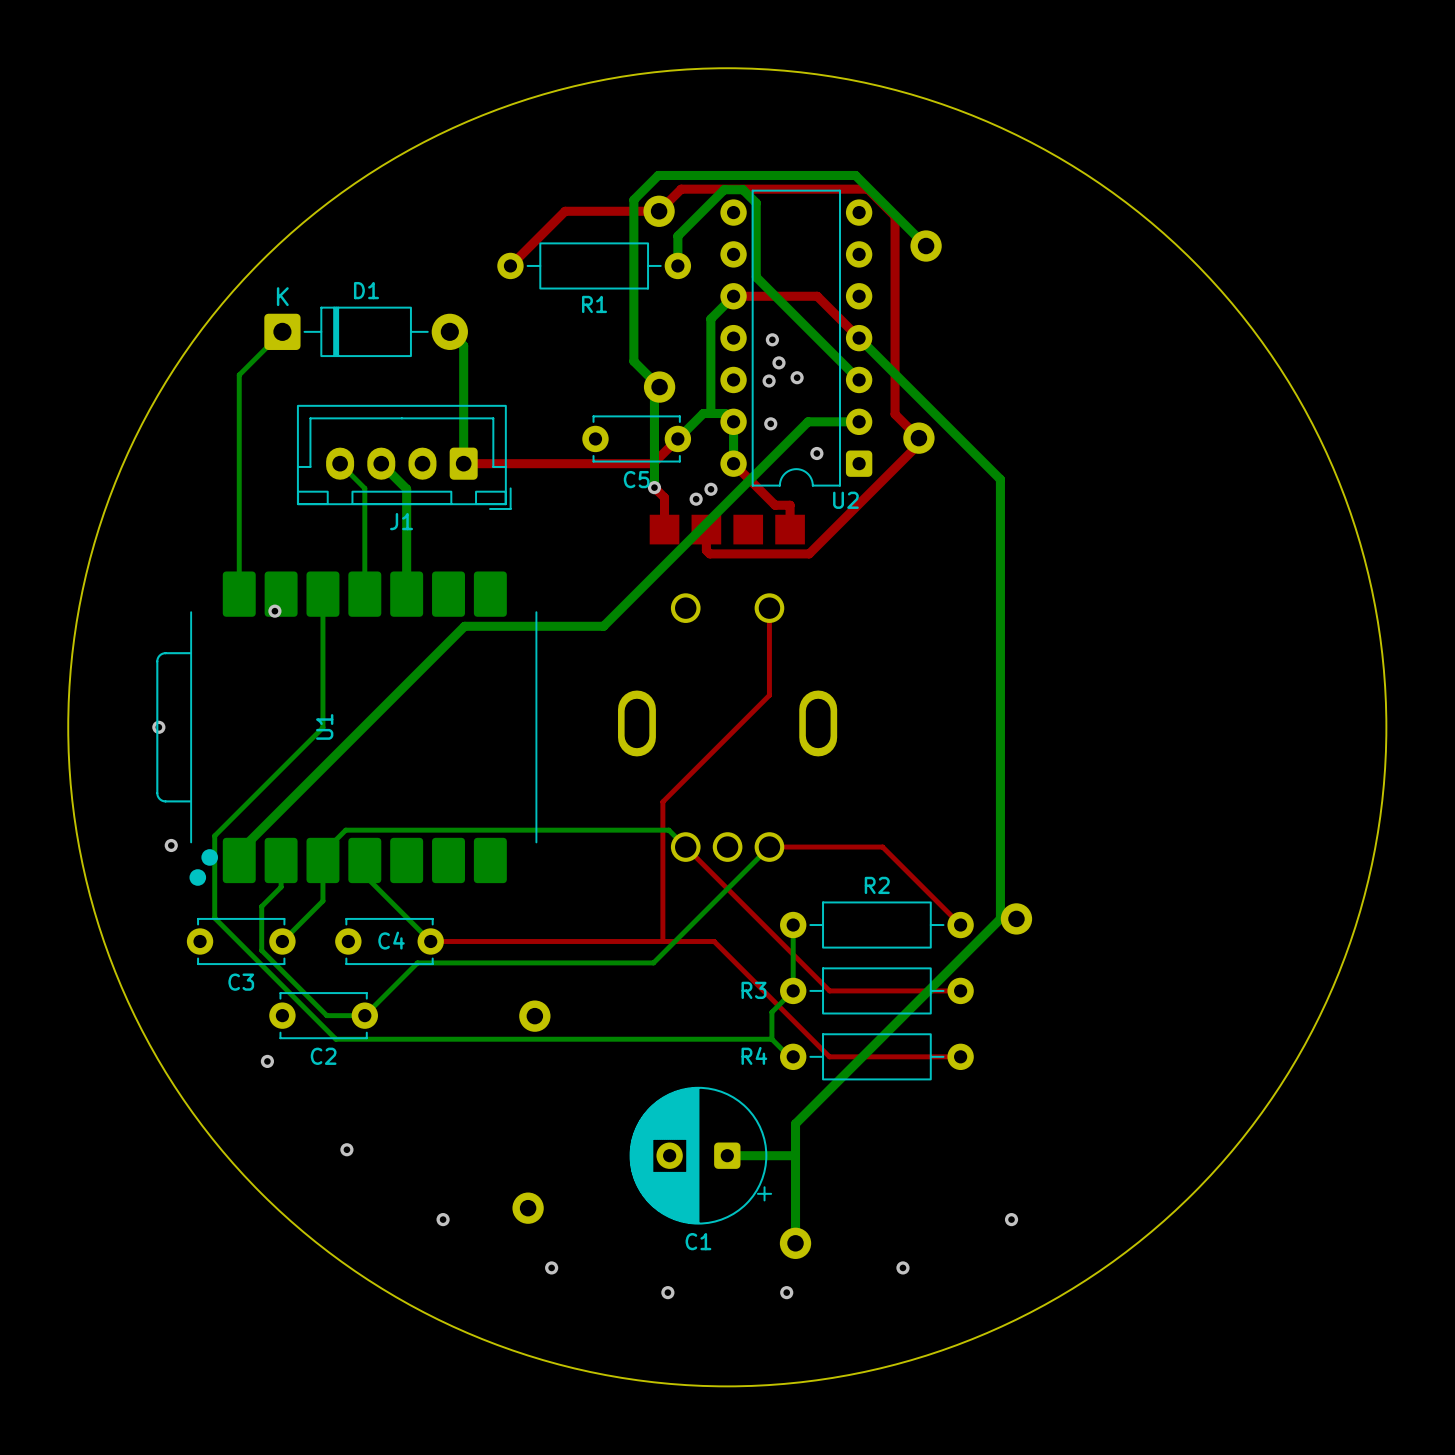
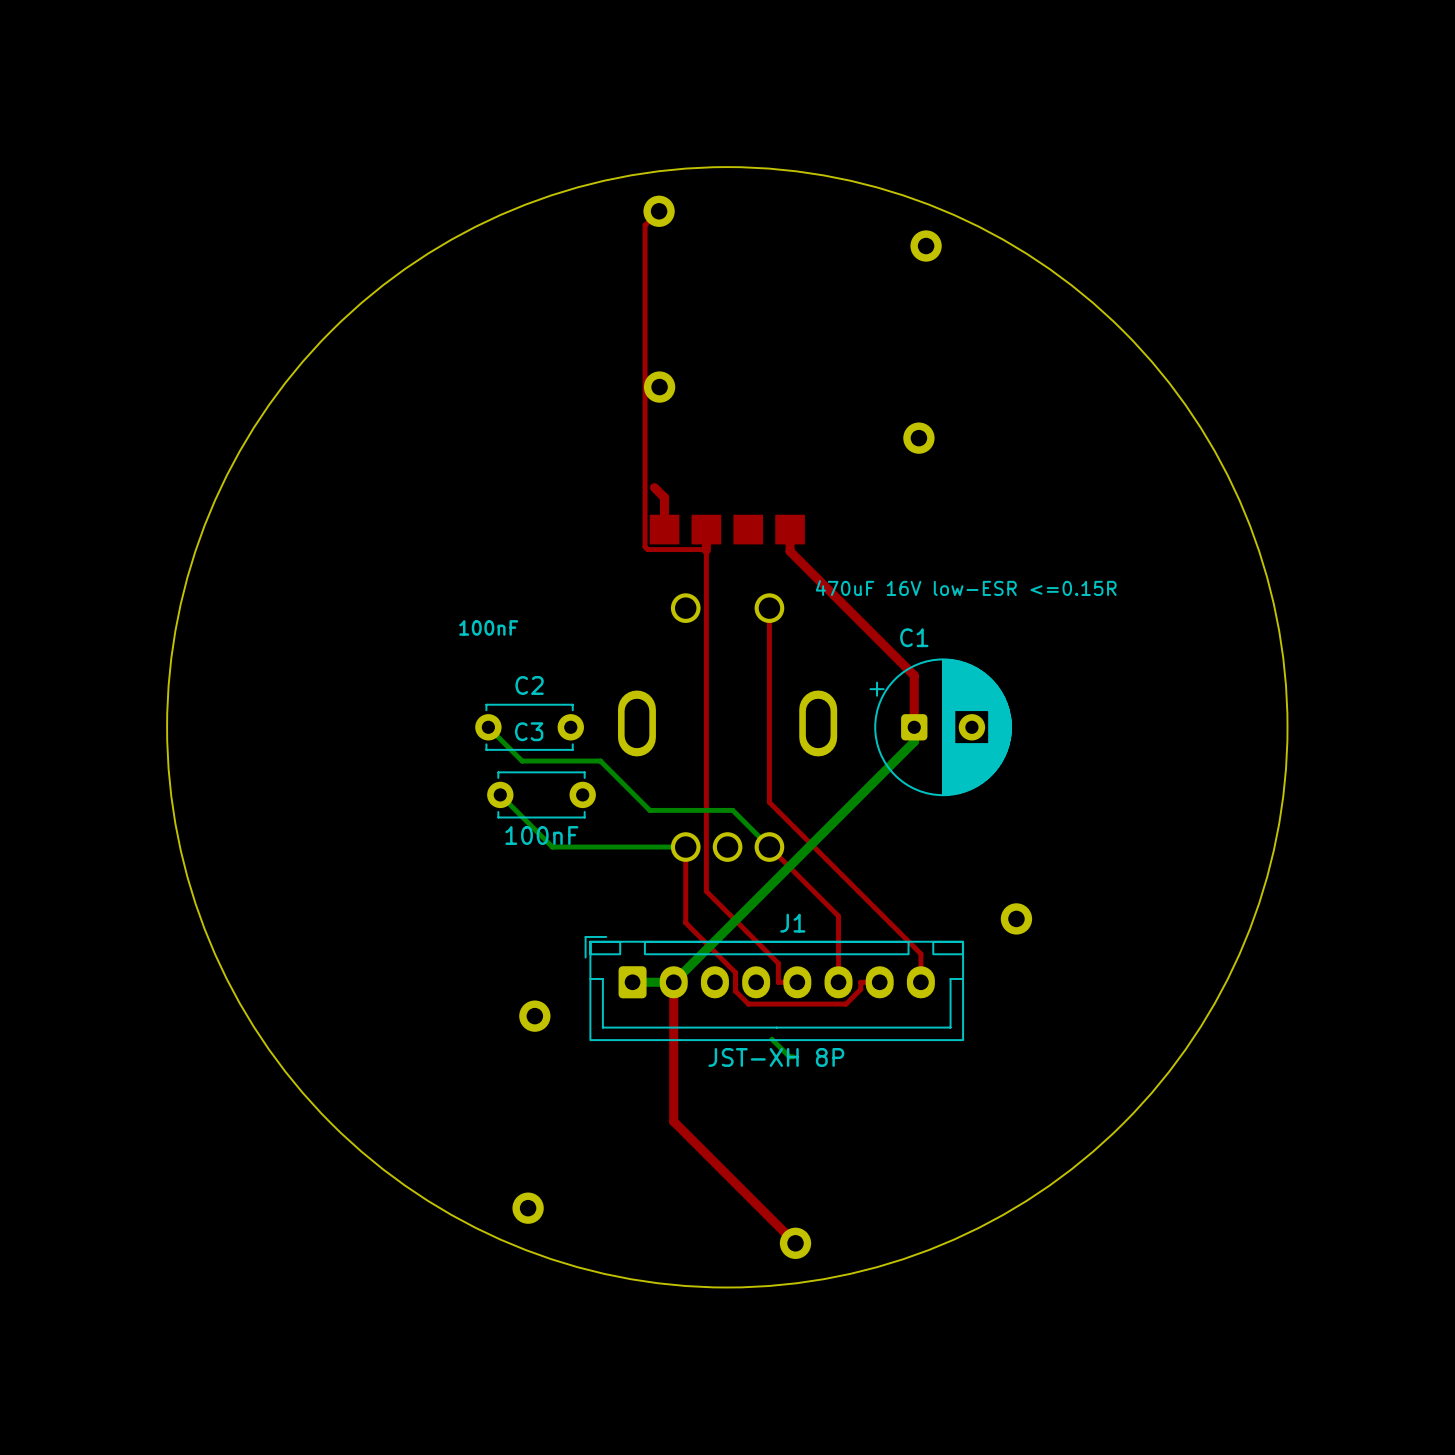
round board edge size: [67, 67, 1388, 1388] -> [166, 166, 1289, 1289]
top track: none -> (659, 211) (645, 225) (645, 546) (647, 549) (706, 549)
bottom track: (926, 246) (855, 175) (658, 175) (633, 199) (633, 361) (659, 387) (654, 392) (654, 487) -> none
top track: (510, 265) (565, 211) (659, 211) (681, 189) (867, 189) (895, 216) (895, 414) (918, 438) (918, 444) (809, 553) (709, 553) (706, 550) -> (797, 982) (778, 982) (778, 963) (706, 891) (706, 550)
R1: (594, 265) -> none
bottom track: (677, 265) (677, 236) (724, 189) (742, 189) (756, 202) (756, 277) (859, 379) -> none
top track: (733, 296) (817, 296) (859, 338) -> none
bottom track: (733, 296) (710, 318) (710, 413) -> none
bottom track: (282, 331) (239, 375) (239, 594) -> none
D1: (366, 331) -> none
bottom track: (449, 331) (463, 345) (463, 463) -> none
U2: (796, 338) -> none
bottom track: (859, 338) (1000, 479) (1000, 918) -> none
via: (772, 339) -> none
via: (778, 362) -> none
via: (797, 377) -> none
via: (769, 381) -> none
J1 footprint: [296, 404, 512, 510] -> [584, 935, 965, 1042]
bottom track: (859, 421) (808, 421) (603, 626) (464, 626) (239, 851) (239, 860) -> none
via: (770, 423) -> none
C5: (636, 438) -> none
top track: (677, 438) (653, 463) (463, 463) -> none
bottom track: (677, 438) (703, 413) (725, 413) (733, 421) (733, 463) -> none
via: (816, 453) -> none
bottom track: (340, 463) (364, 488) (364, 594) -> none
bottom track: (381, 463) (406, 489) (406, 594) -> none
top track: (733, 463) (775, 505) (790, 505) (790, 529) -> (914, 727) (914, 675) (790, 551) (790, 529)
via: (654, 487) -> none
via: (710, 489) -> none
via: (696, 499) -> none
J1 name position: J1 (401, 521) -> J1 (792, 923)
C1 value: none -> 470uF 16V low-ESR <=0.15R (966, 588)
bottom track: (322, 594) (322, 727) (214, 835) (214, 918) (335, 1039) (771, 1039) (771, 1012) (793, 990) (793, 925) -> none
via: (274, 611) -> none
C2 value: none -> 100nF (488, 627)
top track: (769, 695) (662, 801) (662, 941) -> (769, 695) (769, 802) (920, 953) (920, 982)
via: (158, 727) -> none
bottom track: none -> (914, 727) (914, 741) (673, 982) (632, 982)
U1: (346, 728) -> none
C3 value: none -> 100nF (541, 835)
via: (171, 845) -> none
top track: (685, 847) (829, 990) (960, 990) -> (685, 847) (685, 922) (735, 972) (735, 991) (748, 1004) (846, 1004) (860, 989) (860, 982) (879, 982)
bottom track: (685, 847) (668, 830) (345, 830) (322, 852) (322, 900) (282, 941) -> (685, 847) (552, 847) (500, 794)
top track: (769, 847) (882, 847) (960, 925) -> (769, 847) (838, 916) (838, 982)
bottom track: (769, 847) (653, 962) (417, 962) (364, 1015) (326, 1015) (261, 950) (261, 906) (281, 887) (281, 860) -> (769, 847) (732, 810) (649, 810) (600, 761) (522, 761) (488, 727)
bottom track: (364, 860) (364, 875) (430, 941) -> none
bottom track: (1000, 918) (795, 1123) (795, 1243) -> none
R2: (876, 925) -> none
C3 position: (241, 941) -> (541, 794)
C4: (389, 941) -> none
top track: (430, 941) (714, 941) (829, 1056) (960, 1056) -> none
C3 name position: C3 (241, 982) -> C3 (529, 731)
top track: none -> (673, 982) (673, 1121) (795, 1243)
R3: (876, 990) -> none
C2 position: (323, 1015) -> (529, 727)
C2 name position: C2 (323, 1056) -> C2 (529, 685)
R4: (876, 1056) -> none
J1 value: none -> JST-XH 8P (776, 1057)
via: (267, 1061) -> none
via: (346, 1149) -> none
C1 rotation: 0° (700, 1155) -> 180° (940, 727)
C1 position: (700, 1155) -> (940, 727)
bottom track: (795, 1155) (727, 1155) -> none
via: (443, 1219) -> none
via: (1011, 1219) -> none
via: (551, 1267) -> none
via: (902, 1267) -> none
via: (667, 1292) -> none
via: (786, 1292) -> none

